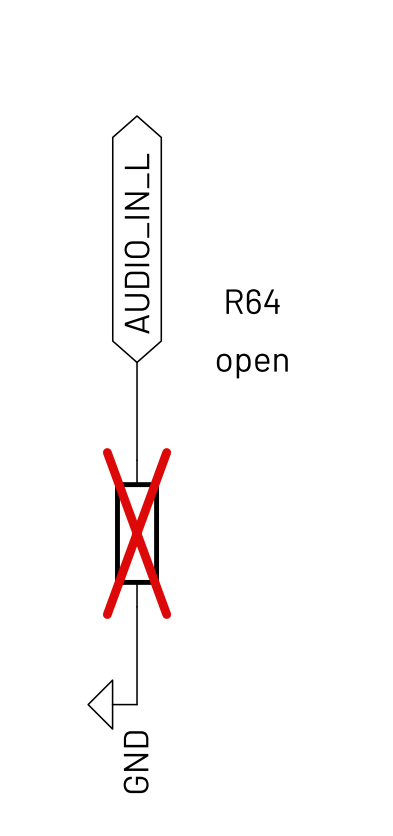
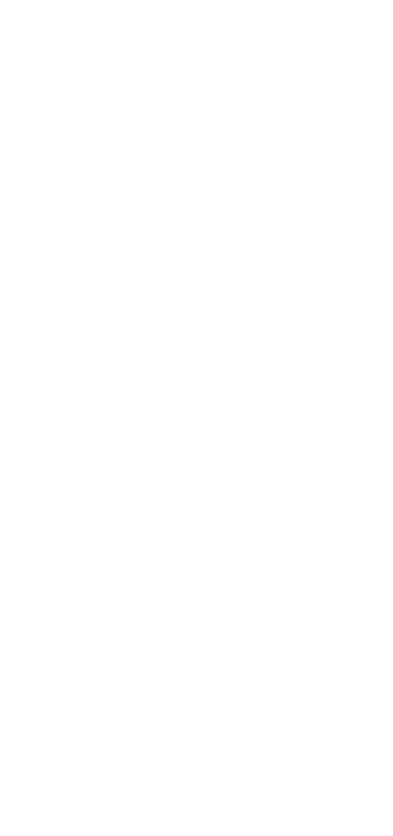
global label: AUDIO_IN_L (137, 243) -> none
wire: (137, 362) (137, 460) -> none
R64: open (137, 533) -> none
wire: (137, 606) (137, 704) -> none
power symbol: GND (112, 704) -> none

